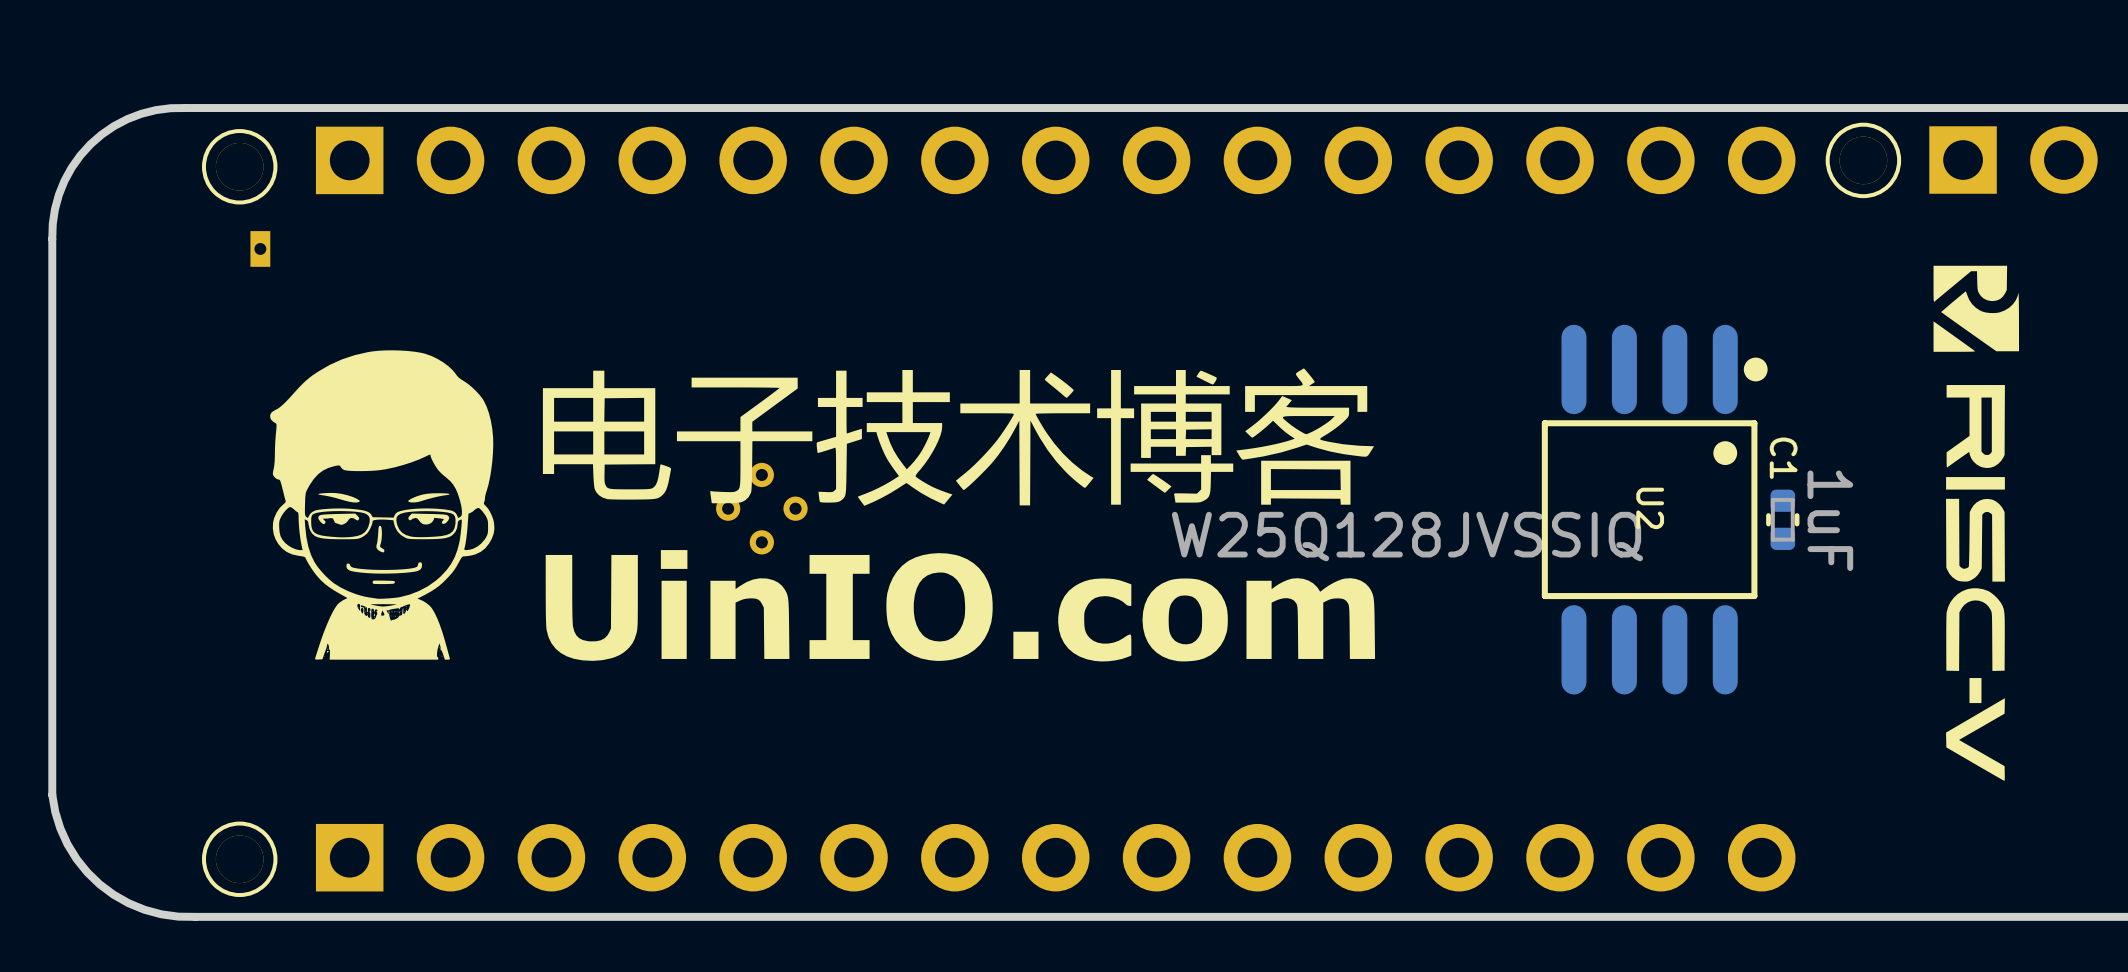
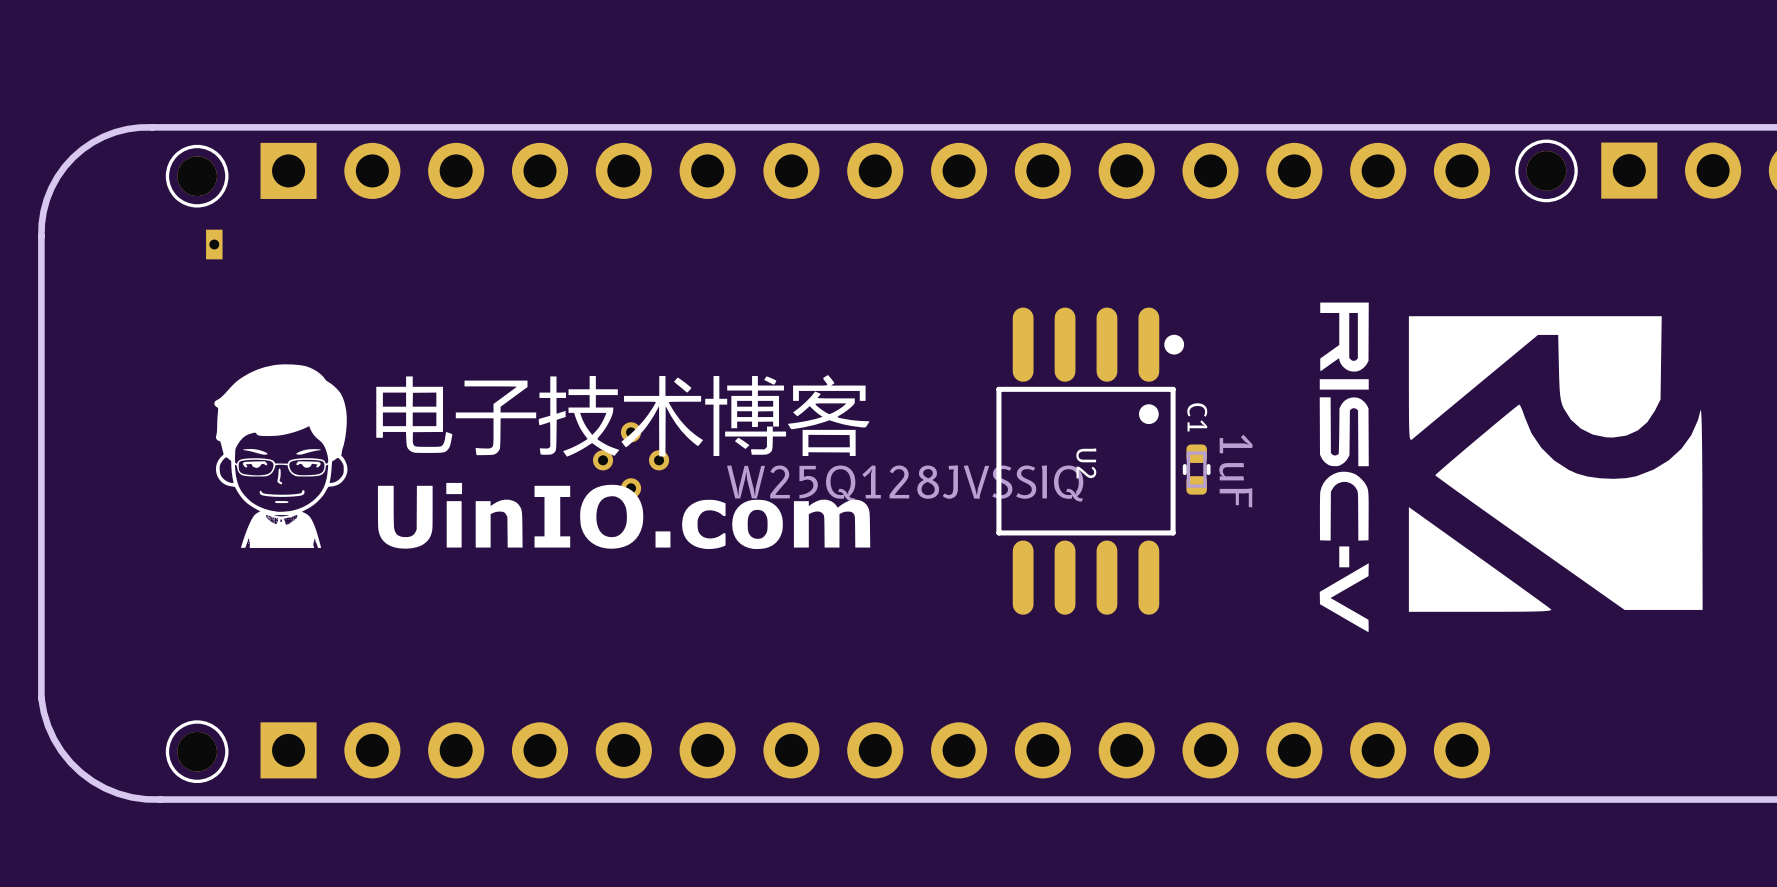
drawing: [1933, 265, 2020, 781] -> none
drawing: none -> [1319, 302, 1369, 633]
drawing: none -> [1408, 316, 1703, 612]
drawing: [270, 350, 1376, 662] -> none
drawing: none -> [214, 364, 871, 550]
U2 position: (1654, 509) -> (1090, 461)
C1 position: (1782, 519) -> (1196, 469)

